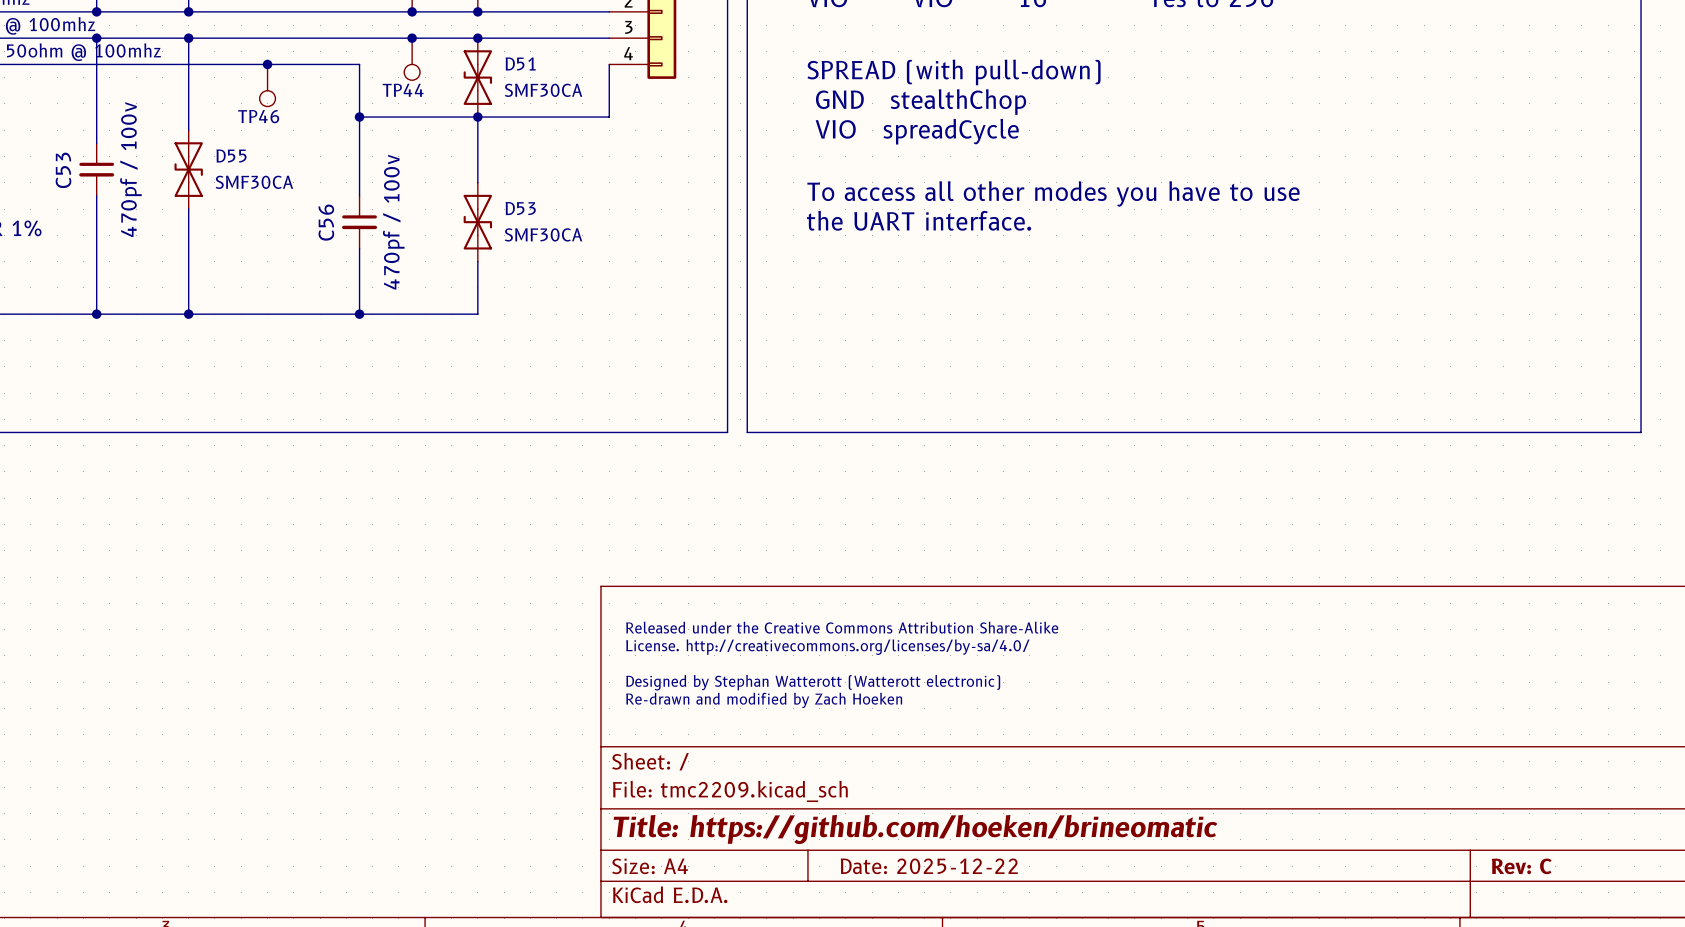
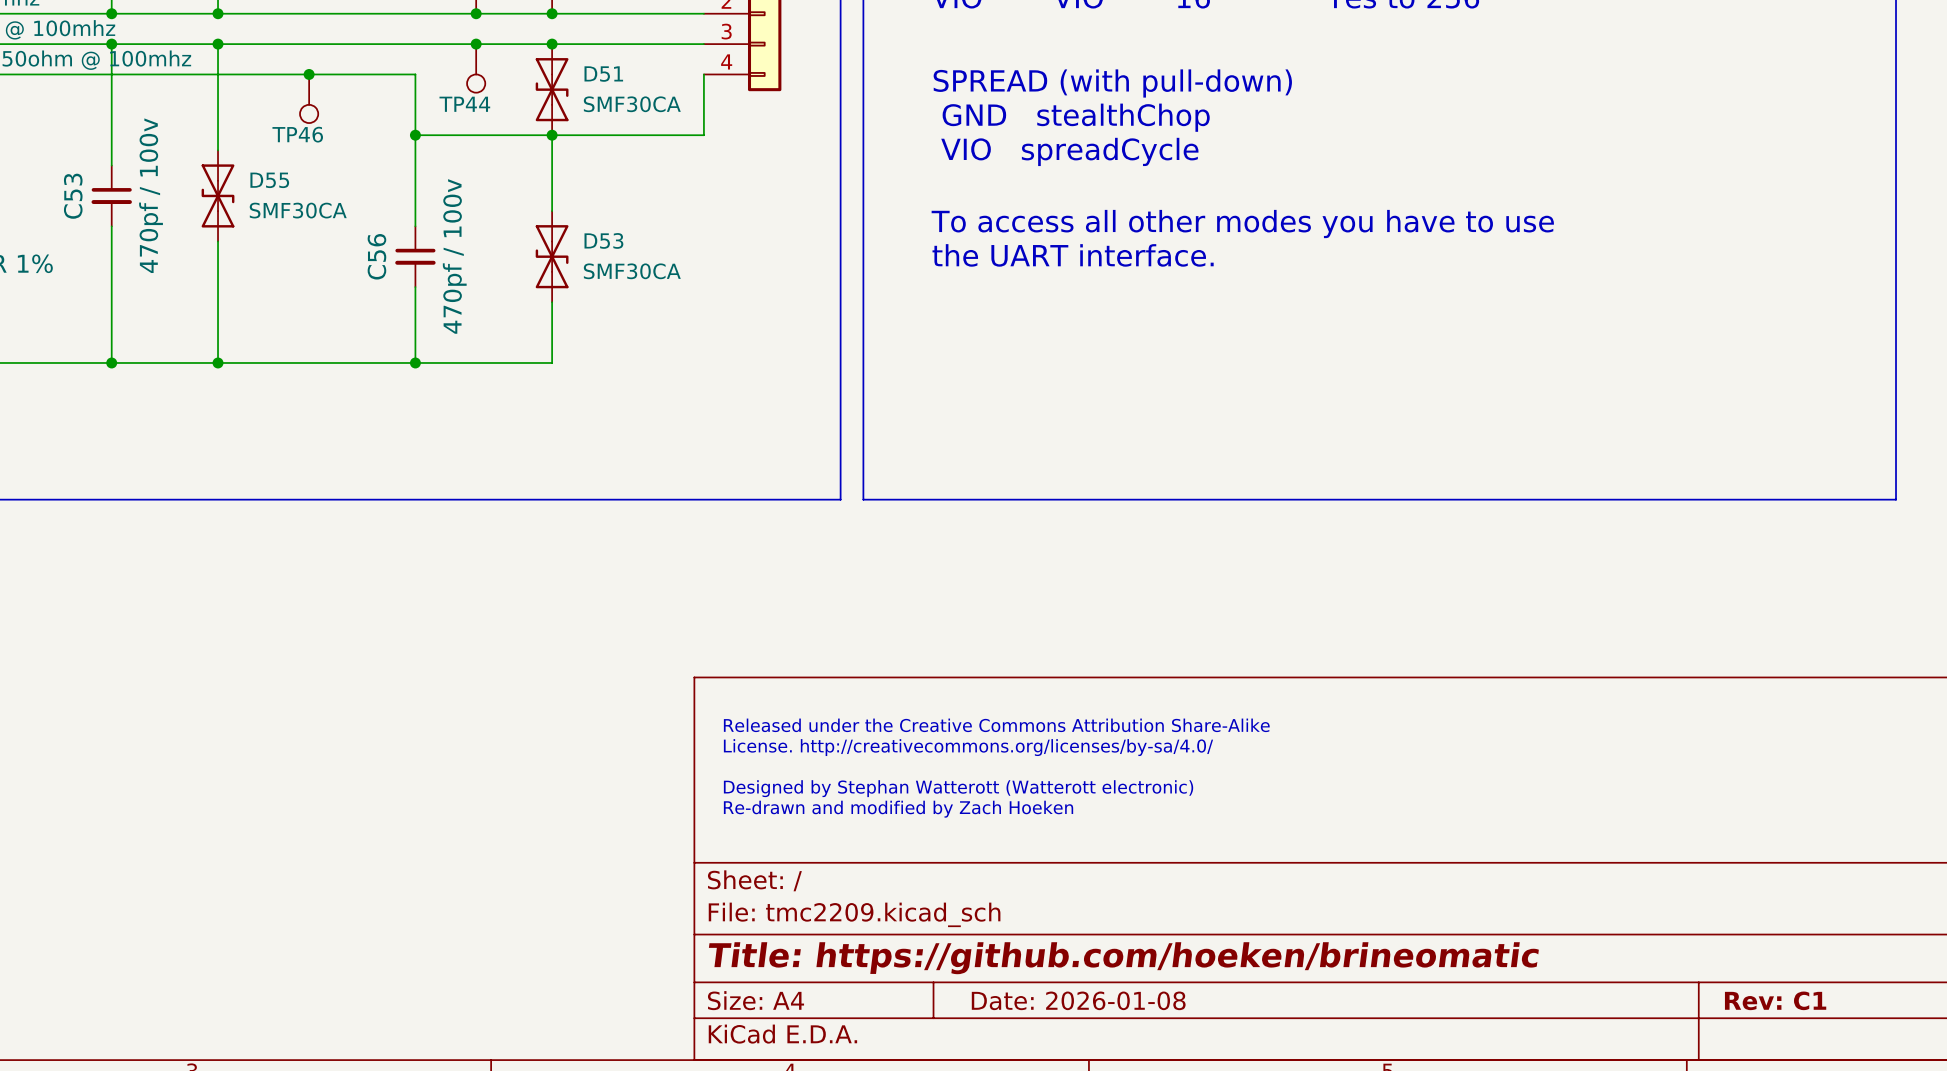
title block: Date: 2025-12-22 (929, 866) -> Date: 2026-01-08 (1078, 1000)
title block: Rev: C (1521, 866) -> Rev: C1 (1775, 1000)

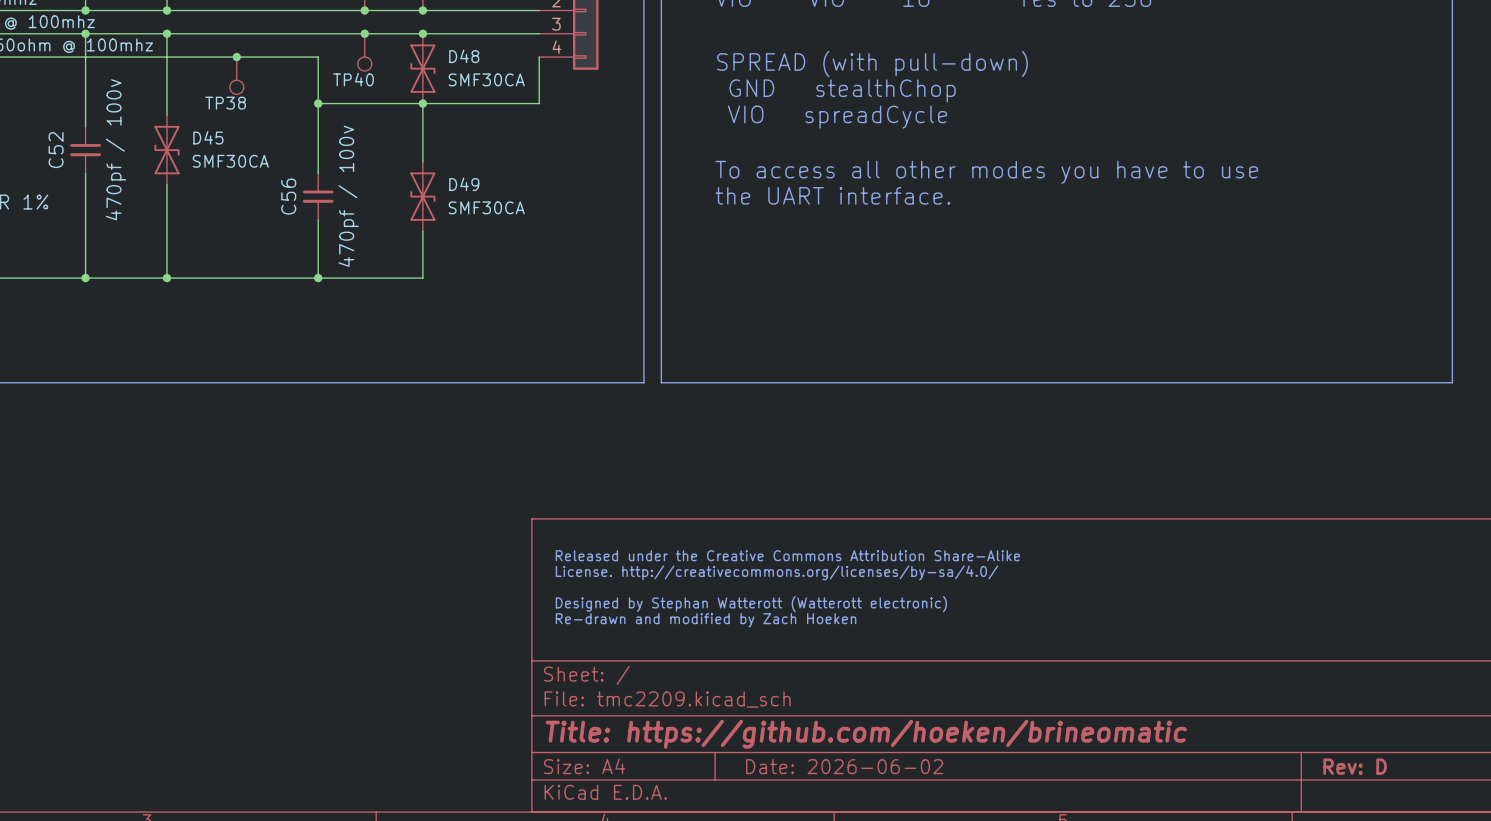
D51 name: D51 (603, 74) -> D48 (464, 56)
TP44 name: TP44 (464, 104) -> TP40 (353, 79)
TP46 name: TP46 (297, 134) -> TP38 (225, 103)
D55 name: D55 (269, 180) -> D45 (208, 137)
C53 name: C53 (73, 196) -> C52 (56, 150)
D53 name: D53 (603, 240) -> D49 (464, 184)
title block: Date: 2026-01-08 (1078, 1000) -> Date: 2026-06-02 (844, 766)
title block: Rev: C1 (1775, 1000) -> Rev: D (1355, 766)

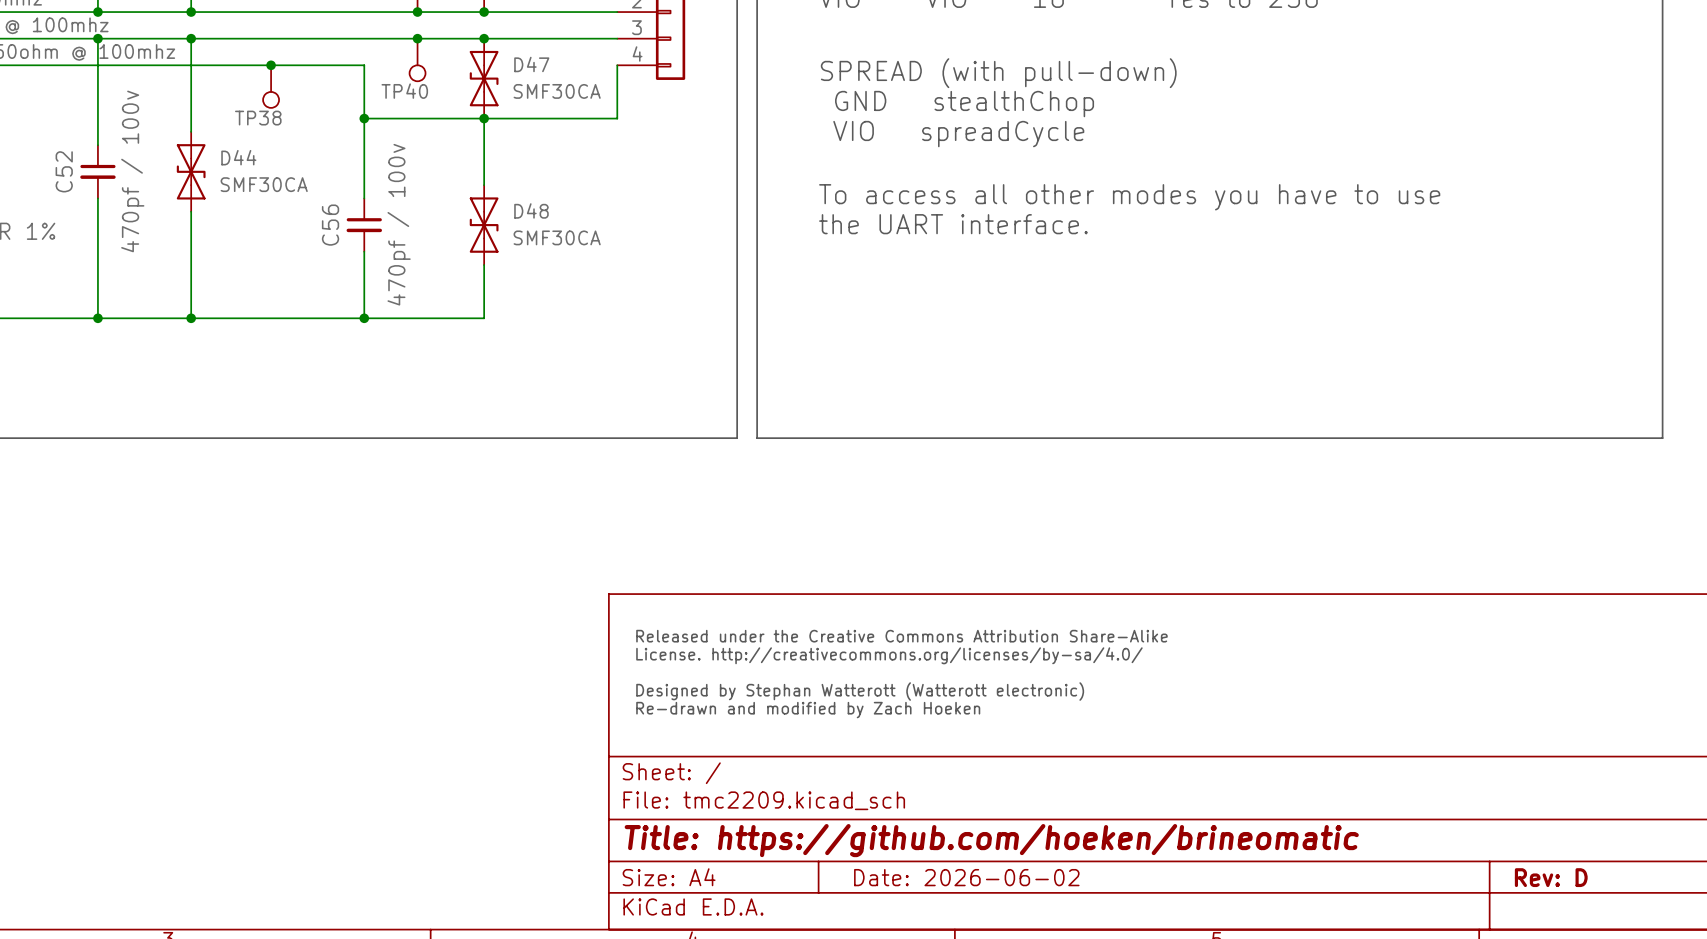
D48 name: D48 (464, 56) -> D47 (531, 64)
D45 name: D45 (208, 137) -> D44 (238, 157)
D49 name: D49 (464, 184) -> D48 (531, 210)

